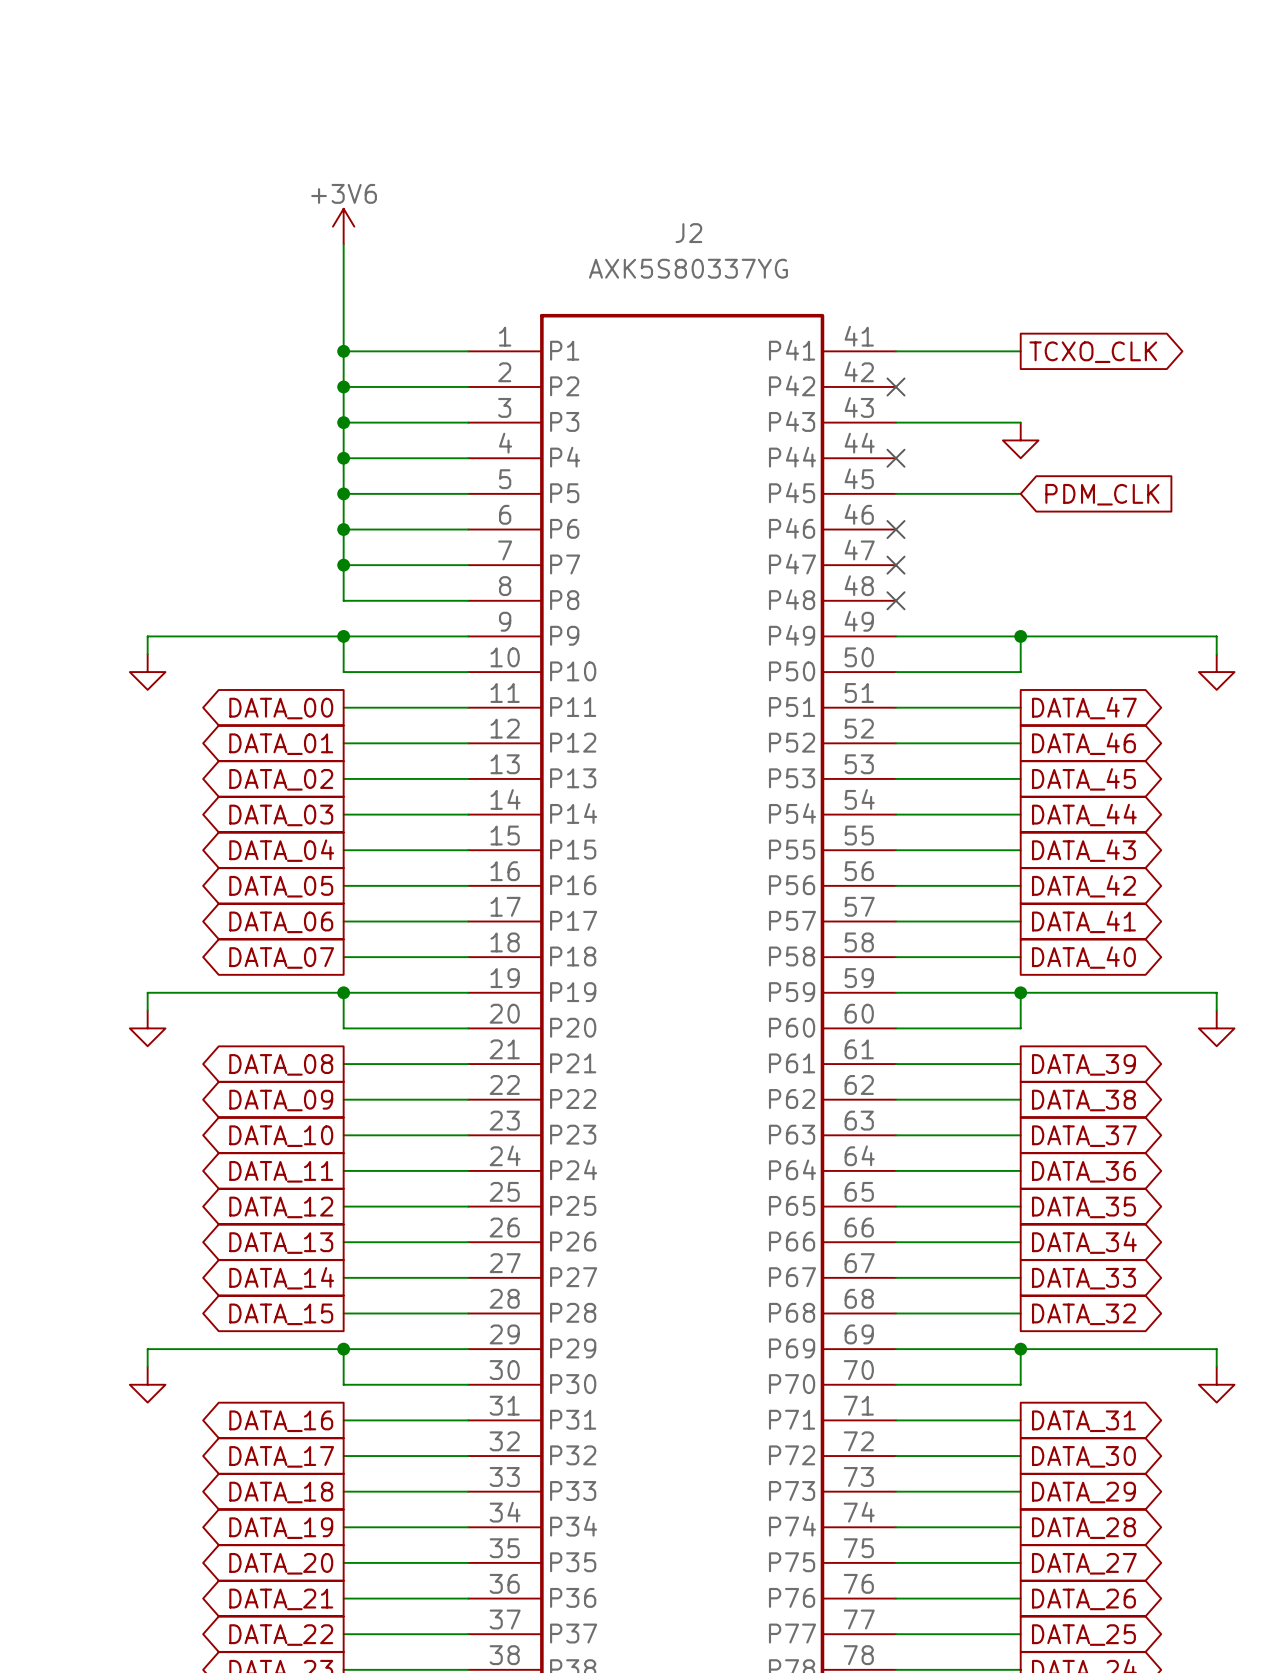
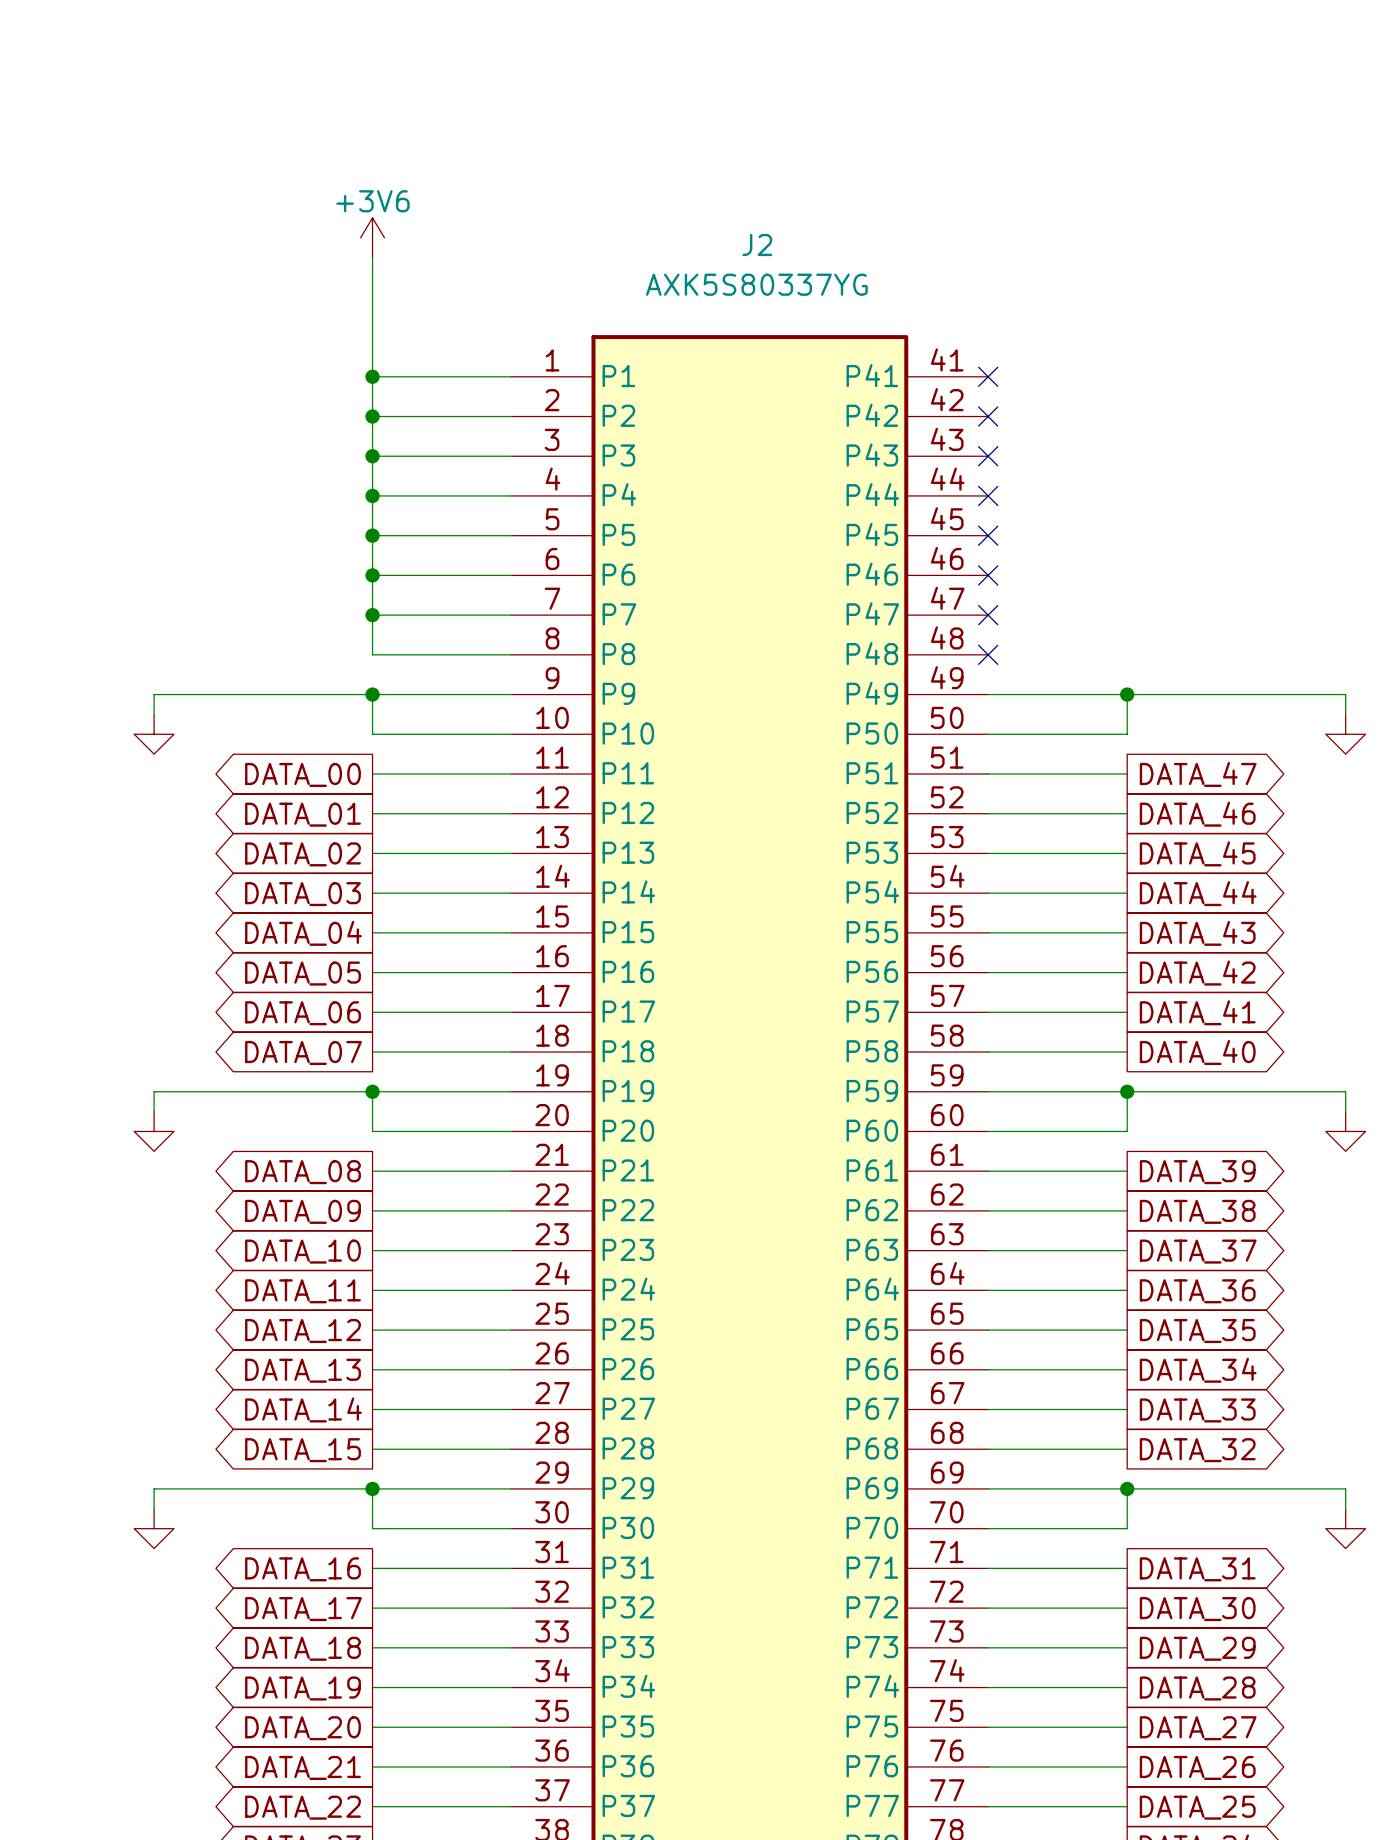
wire: (895, 351) (1020, 351) -> none
no-connect mark: none -> (988, 376)
global label: TCXO_CLK (1093, 352) -> none
wire: (895, 422) (1020, 422) -> none
no-connect mark: none -> (988, 456)
power symbol: (1020, 440) -> none
wire: (895, 493) (1020, 493) -> none
no-connect mark: none -> (988, 535)
global label: PDM_CLK (1102, 494) -> none

